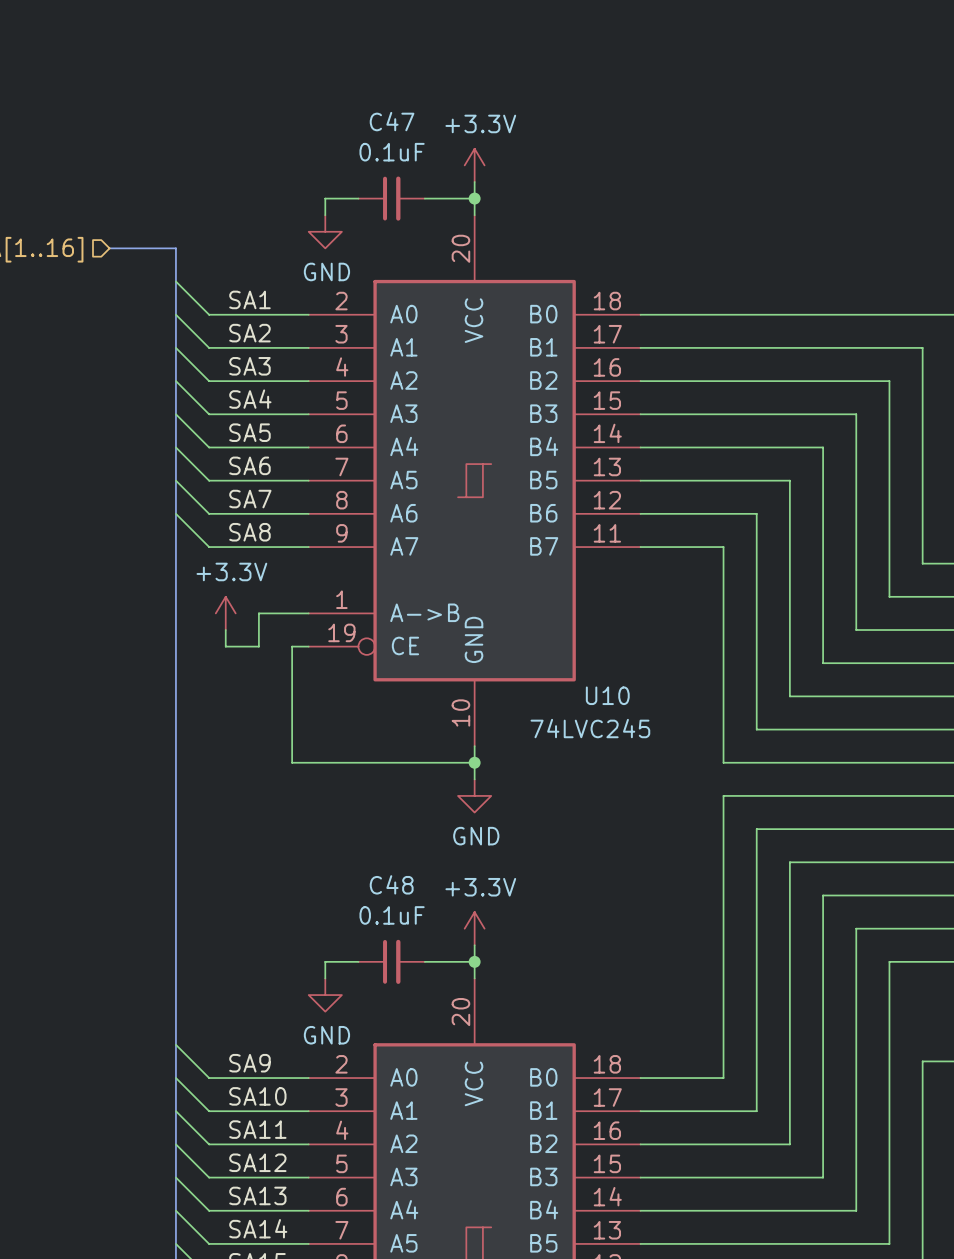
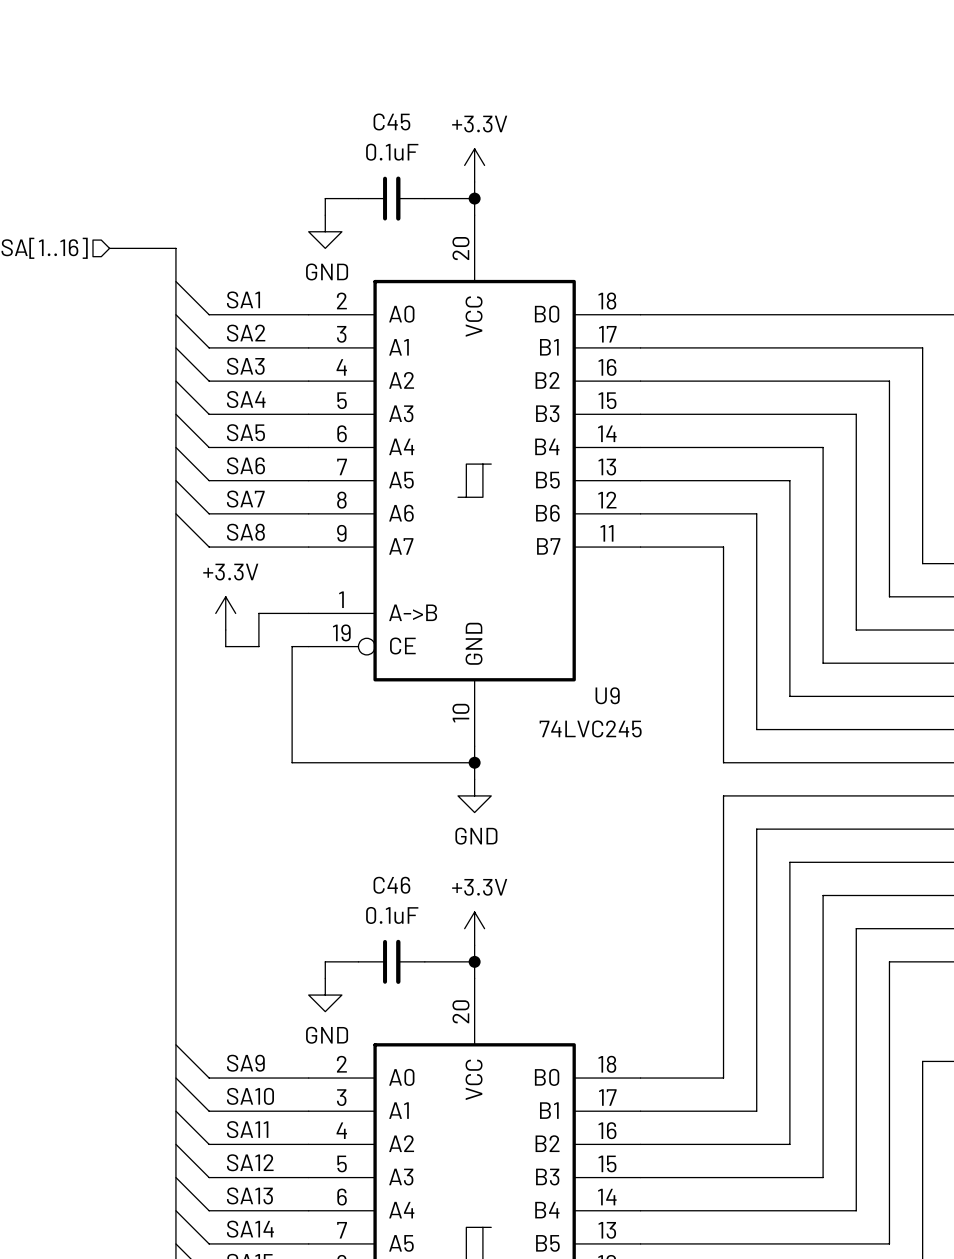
C47 name: C47 (392, 121) -> C45 (391, 121)
U10 name: U10 (607, 695) -> U9 (607, 695)
C48 name: C48 (391, 884) -> C46 (391, 885)

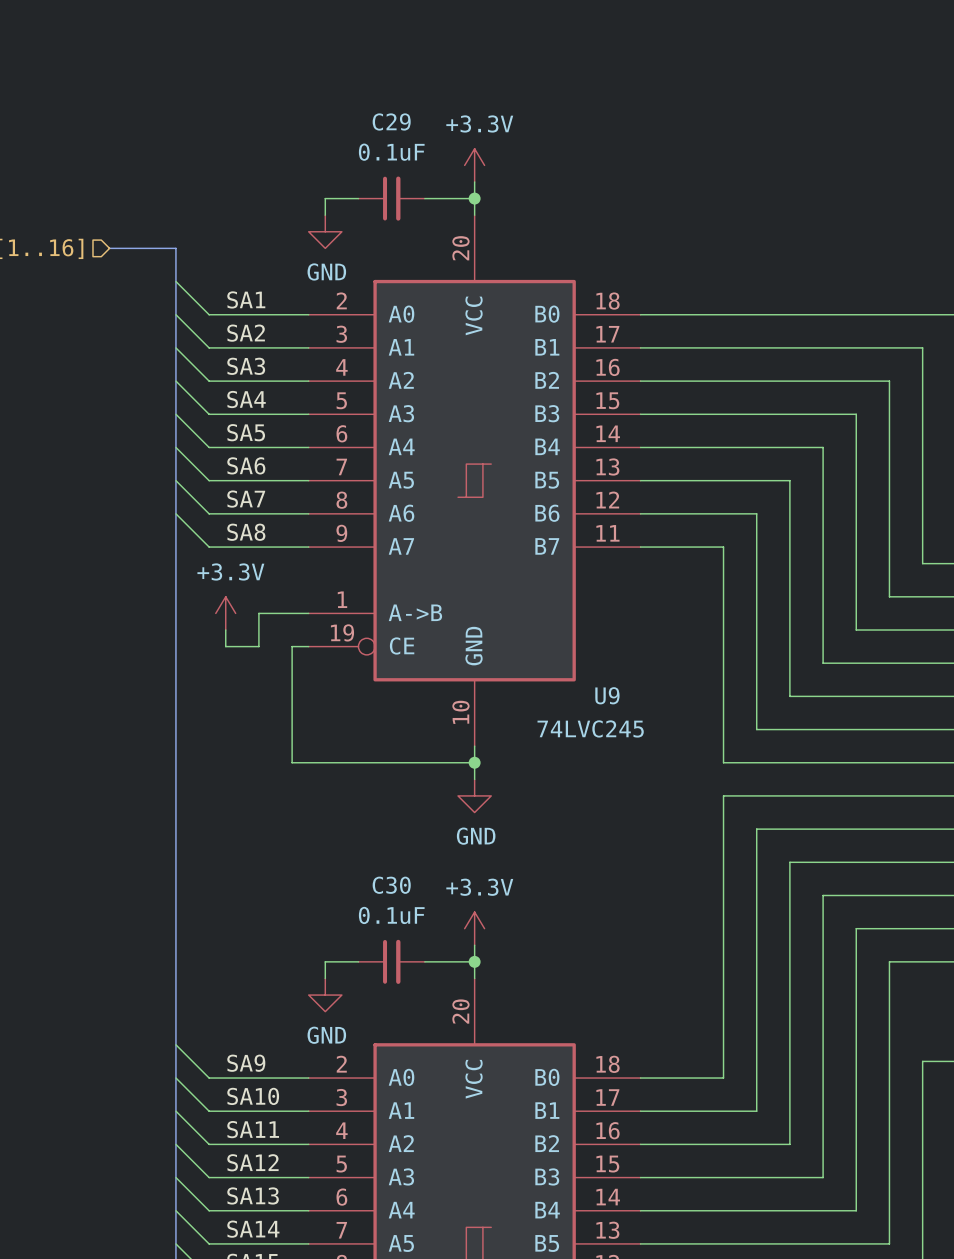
C45 name: C45 (391, 121) -> C29 (391, 121)
C46 name: C46 (391, 885) -> C30 (391, 885)

